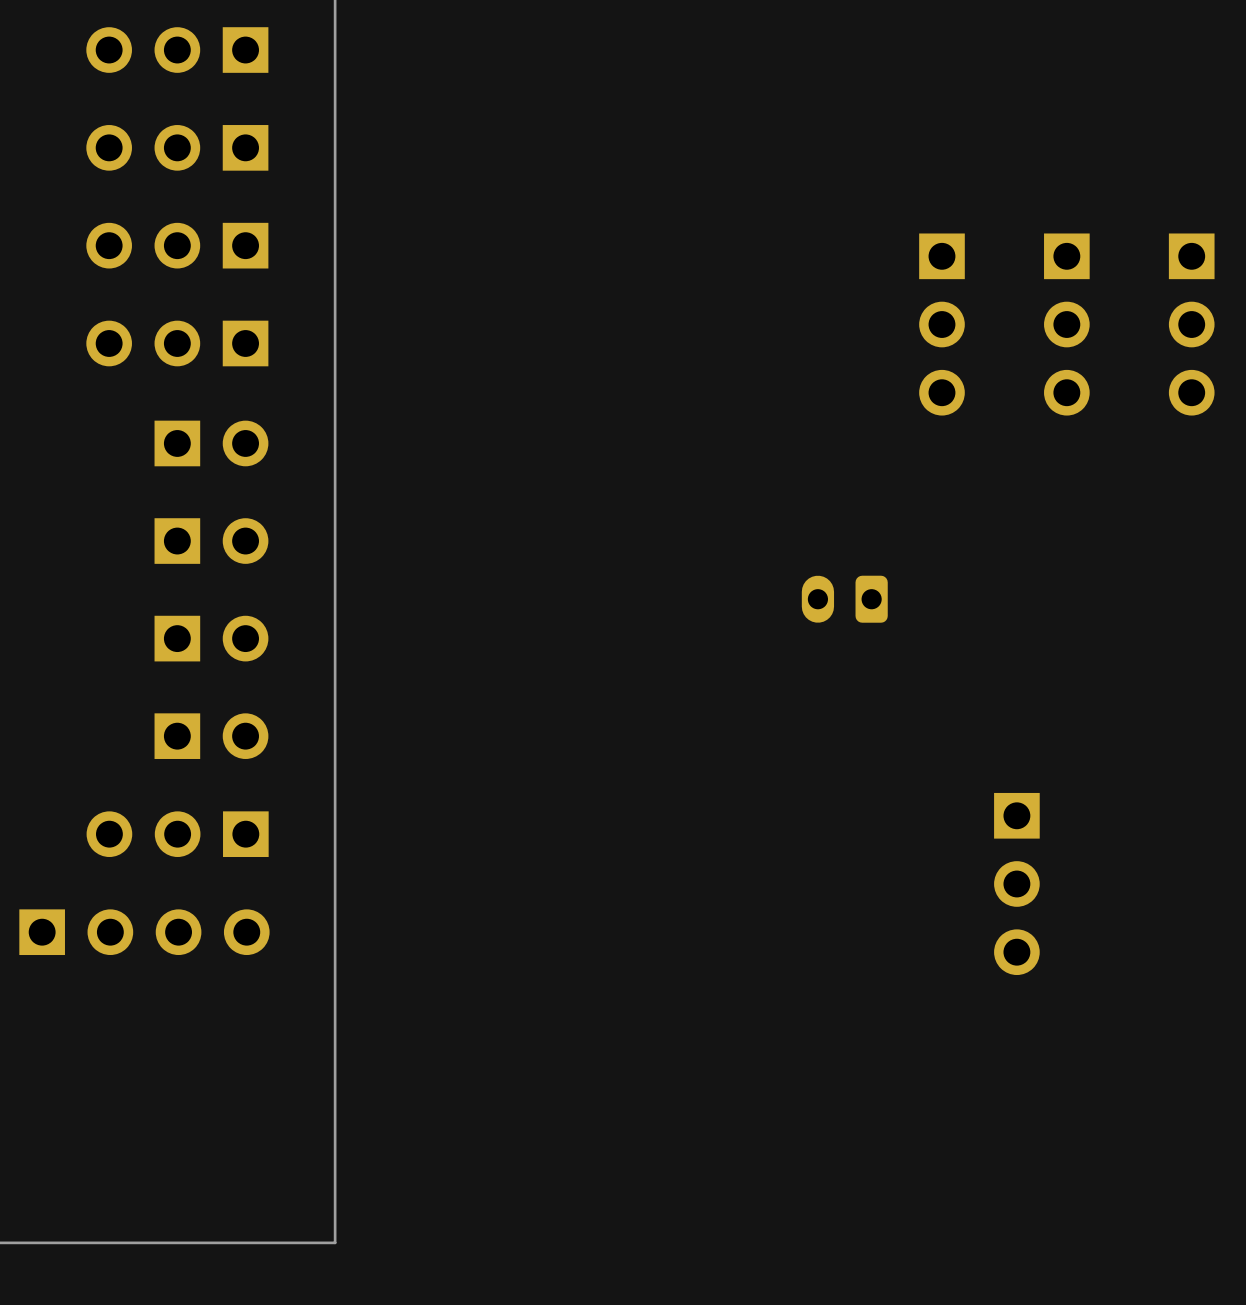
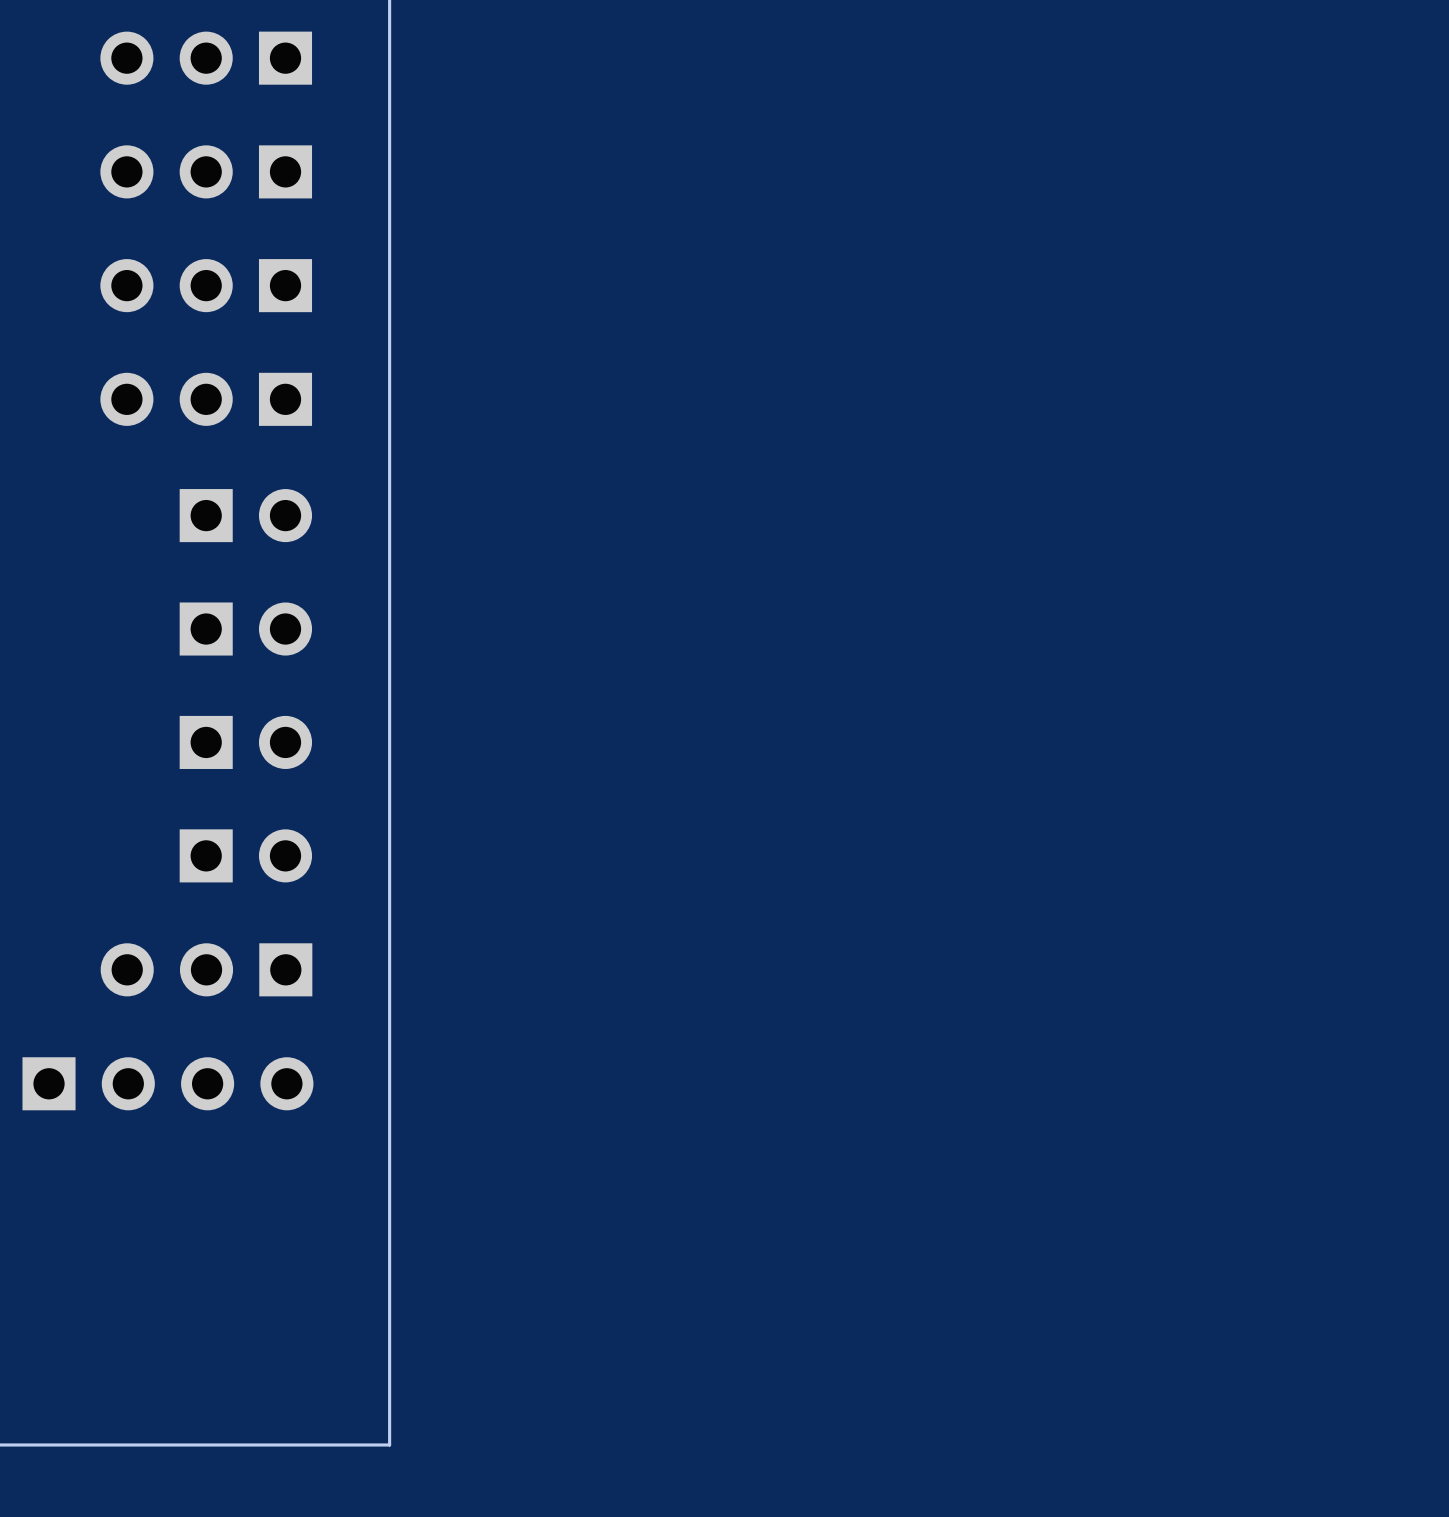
part: (941, 324) -> none
part: (1066, 324) -> none
part: (1191, 324) -> none
part: (844, 599) -> none
part: (1016, 883) -> none

